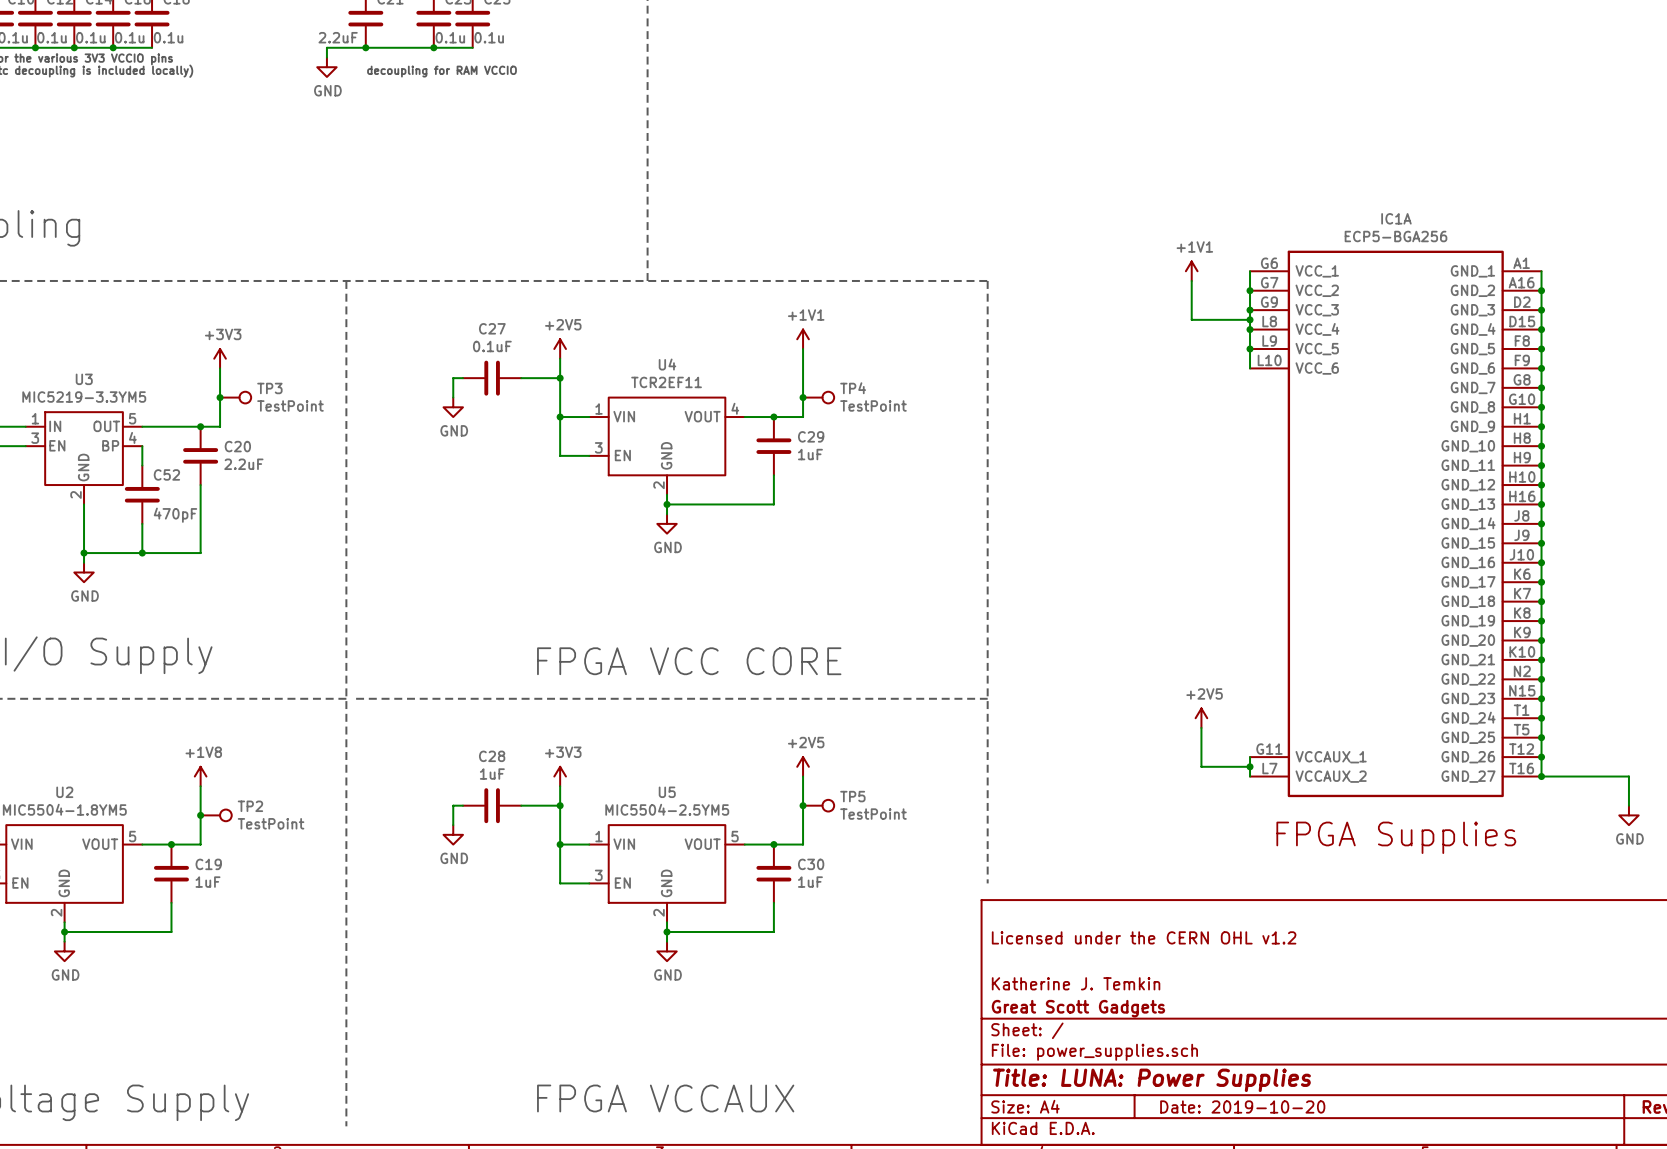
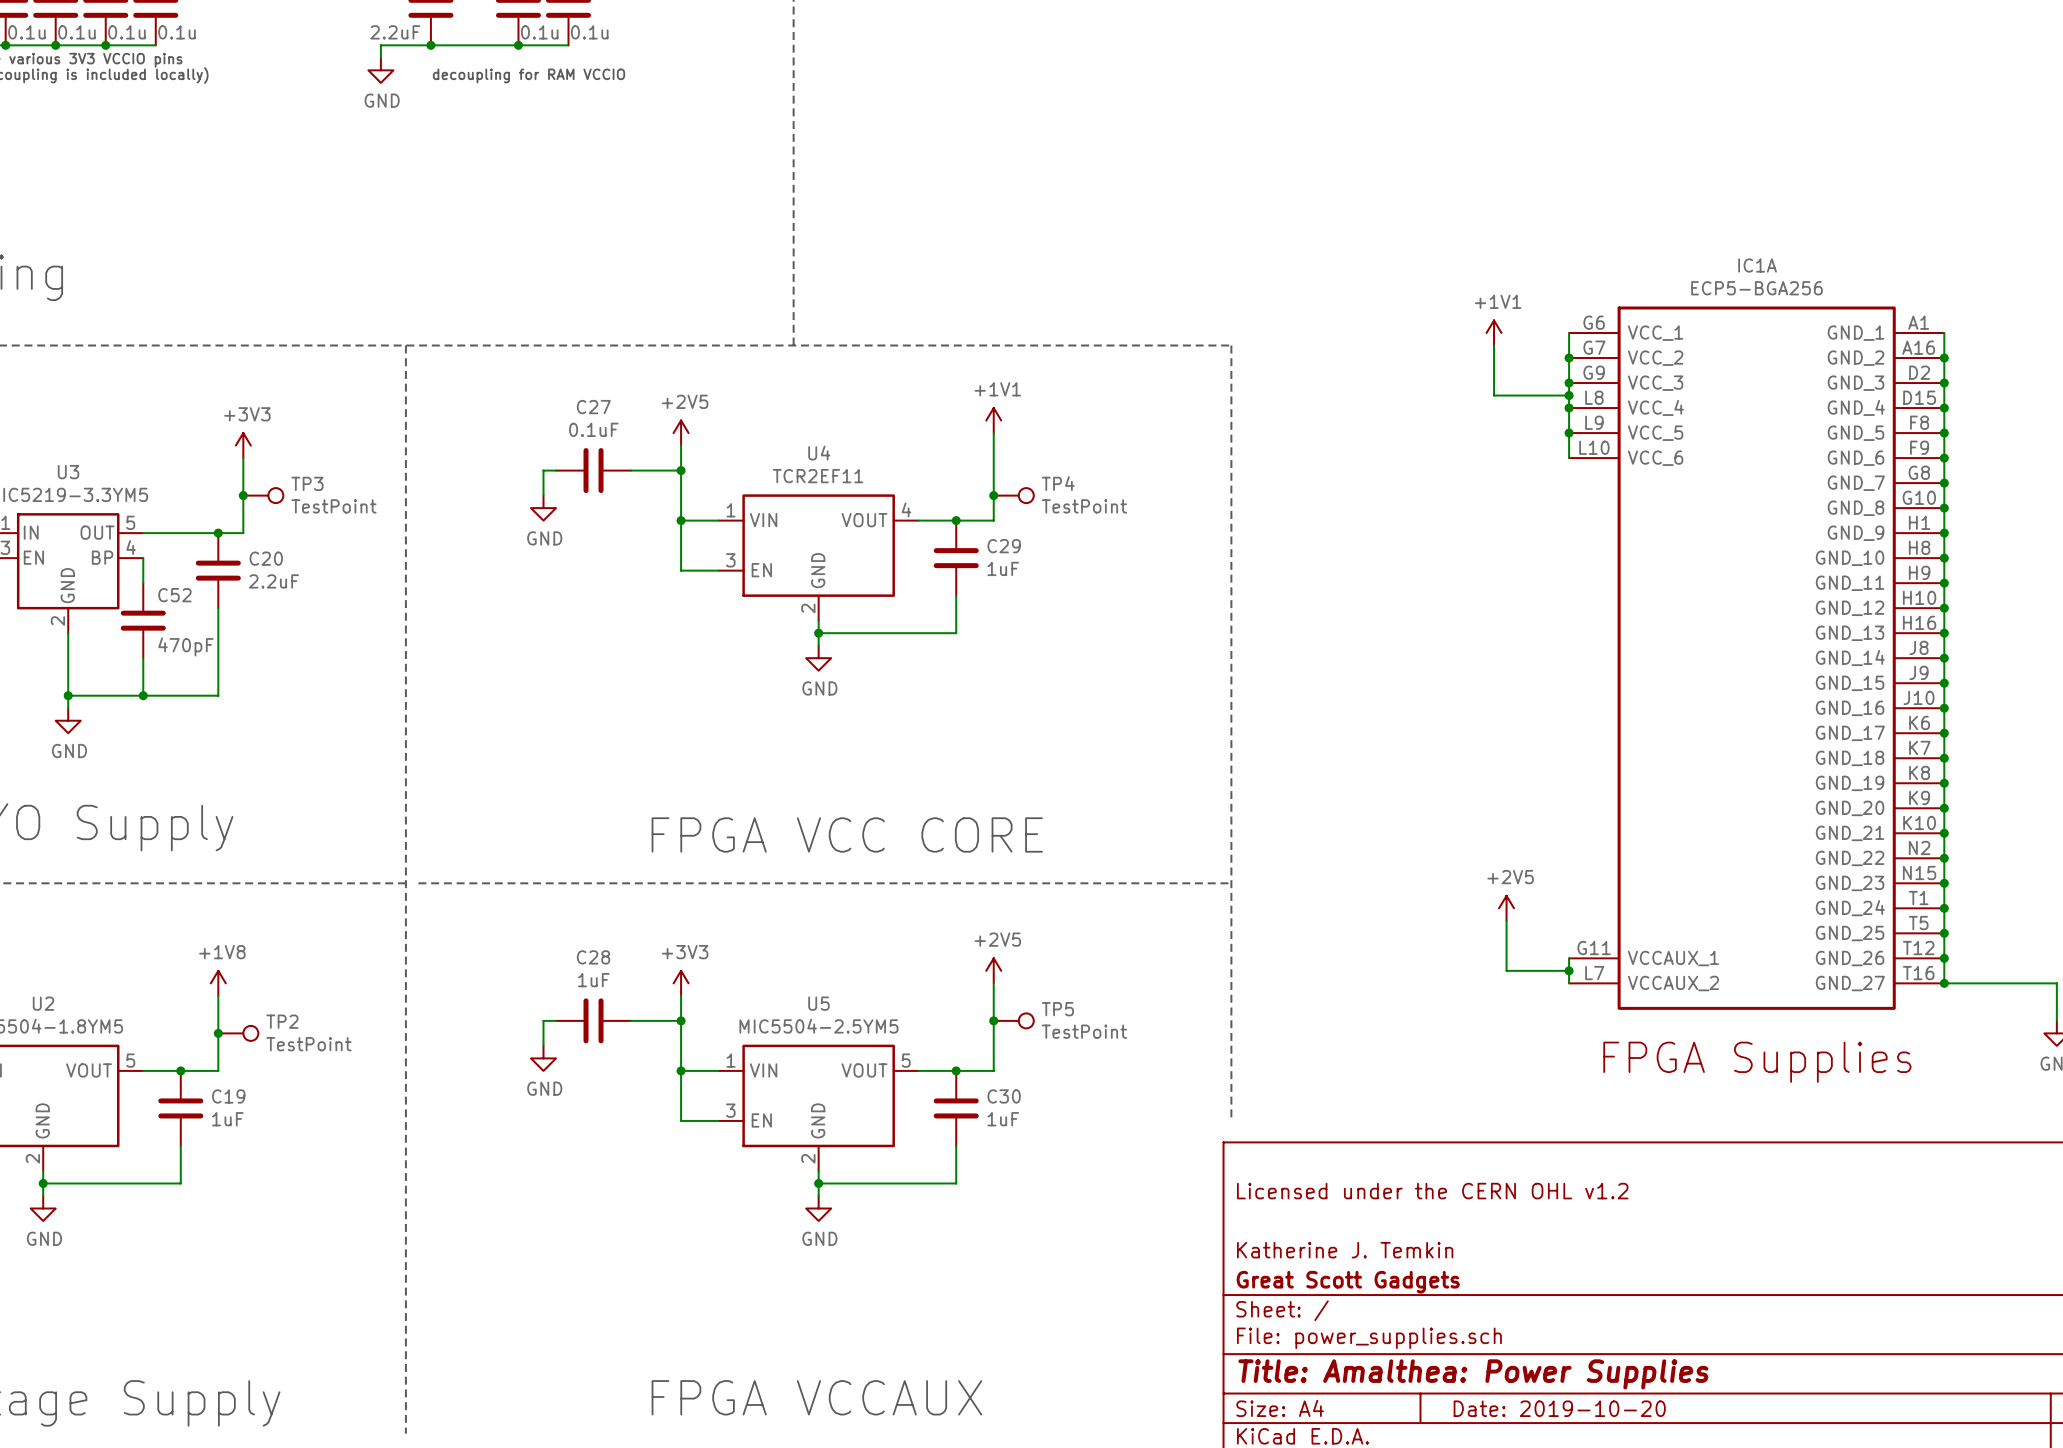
title block: Title: LUNA: Power Supplies (1151, 1080) -> Title: Amalthea: Power Supplies (1473, 1374)

